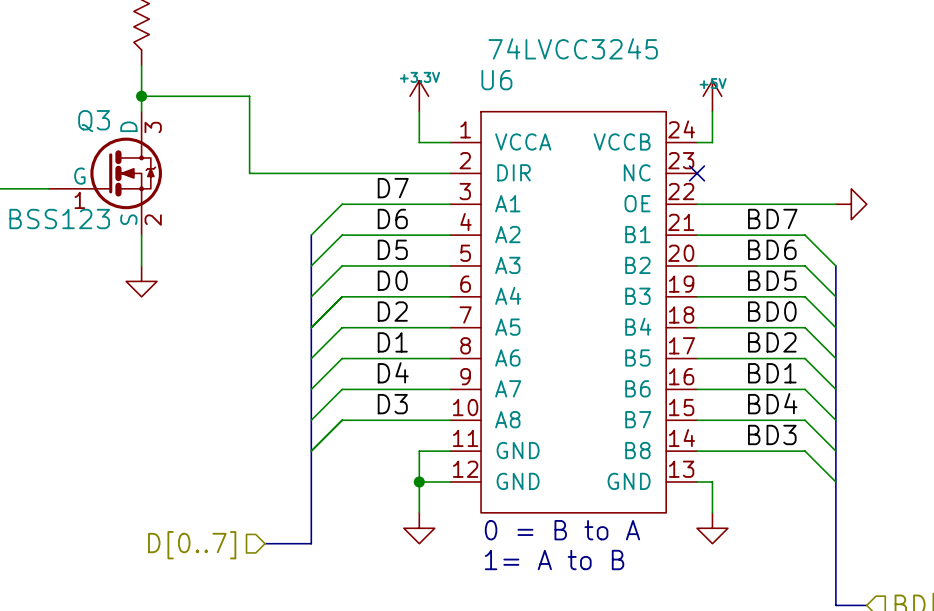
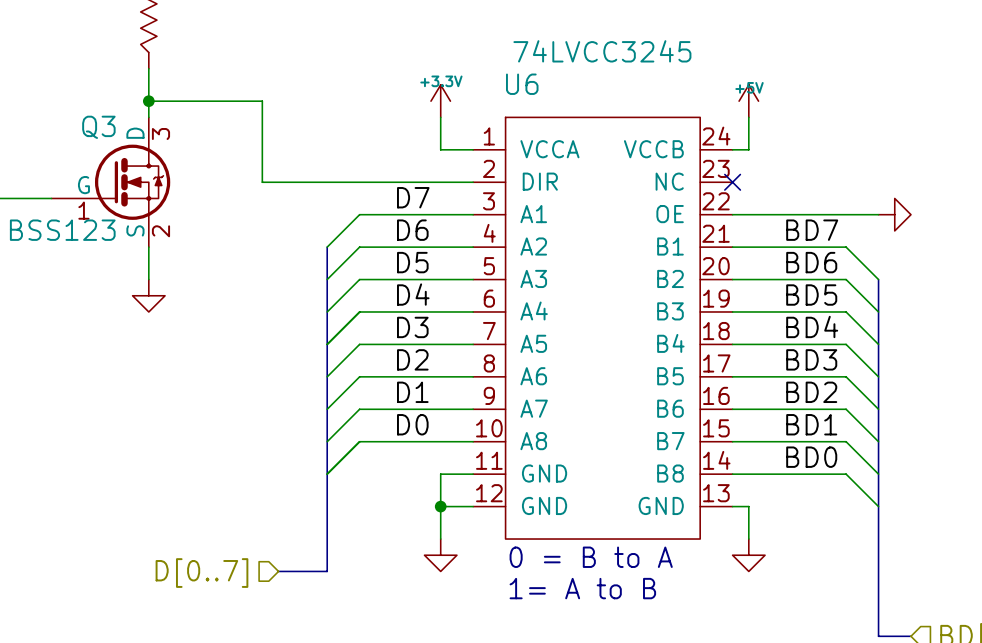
label: D0 (392, 280) -> D4 (413, 294)
label: D2 (392, 311) -> D3 (412, 327)
label: BD0 (772, 311) -> BD4 (812, 326)
label: D1 (392, 342) -> D2 (412, 359)
label: BD2 (772, 342) -> BD3 (811, 359)
label: D4 (393, 372) -> D1 (412, 392)
label: BD1 (772, 373) -> BD2 (811, 392)
label: BD4 (772, 403) -> BD1 (811, 424)
label: D3 (392, 404) -> D0 (412, 424)
label: BD3 (772, 434) -> BD0 (811, 457)

